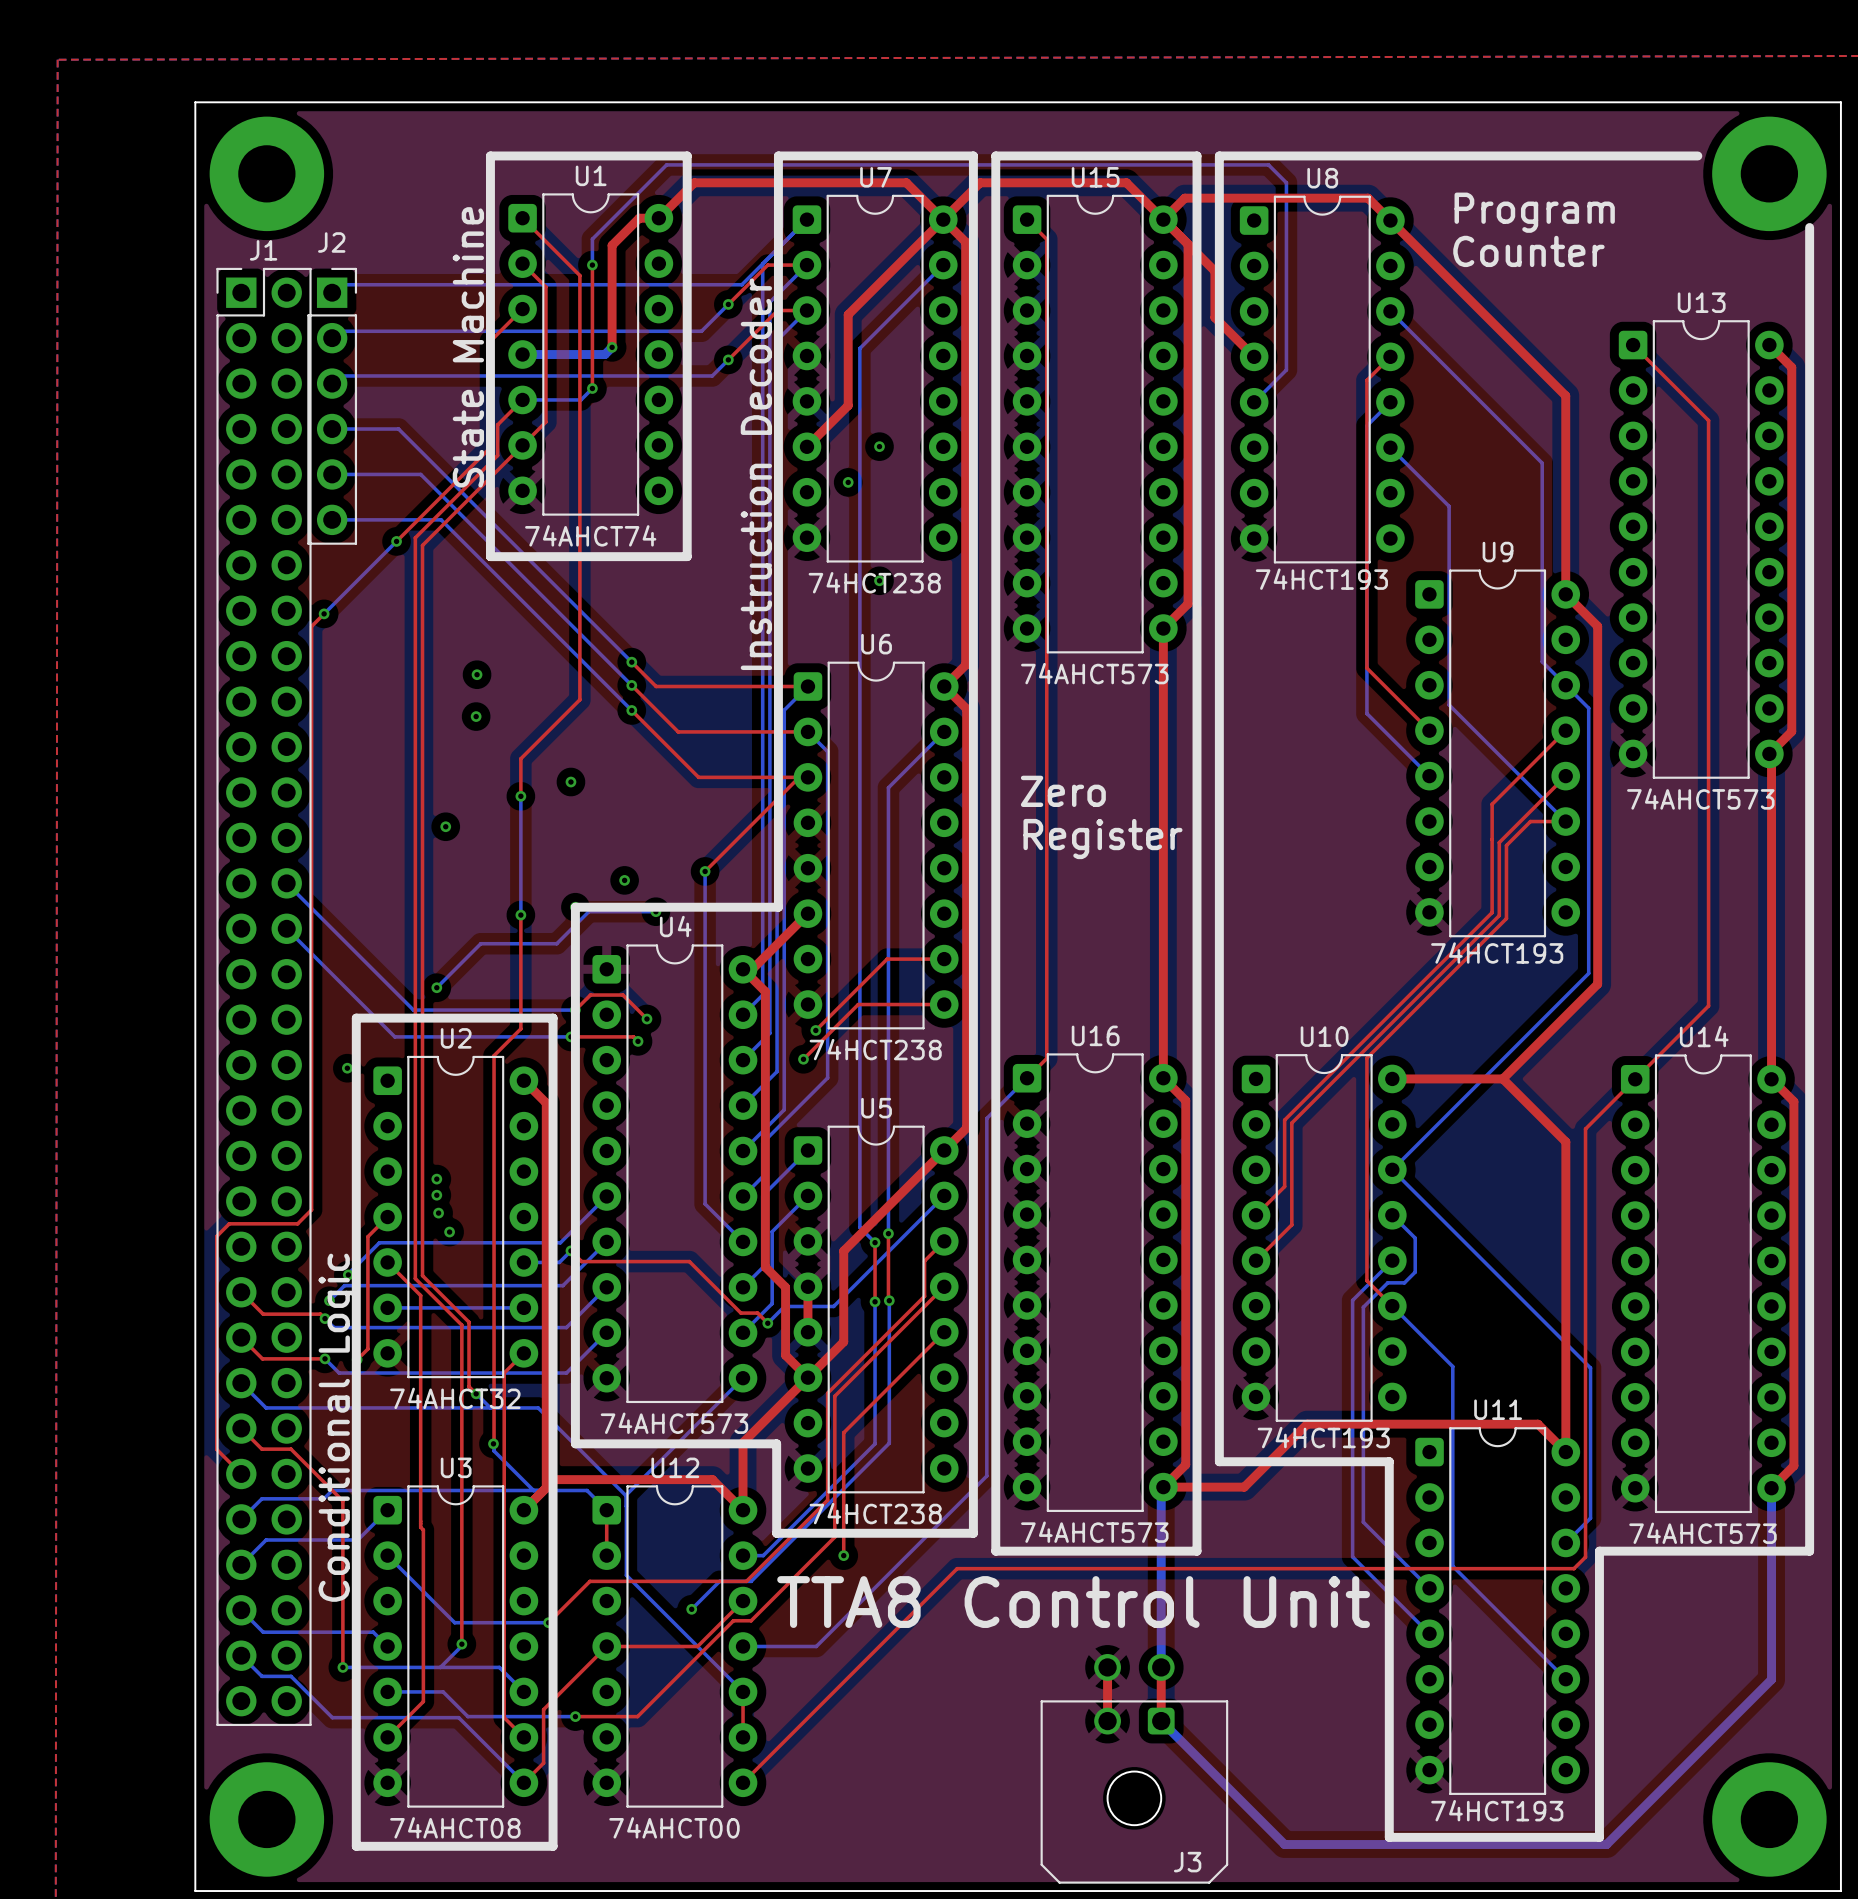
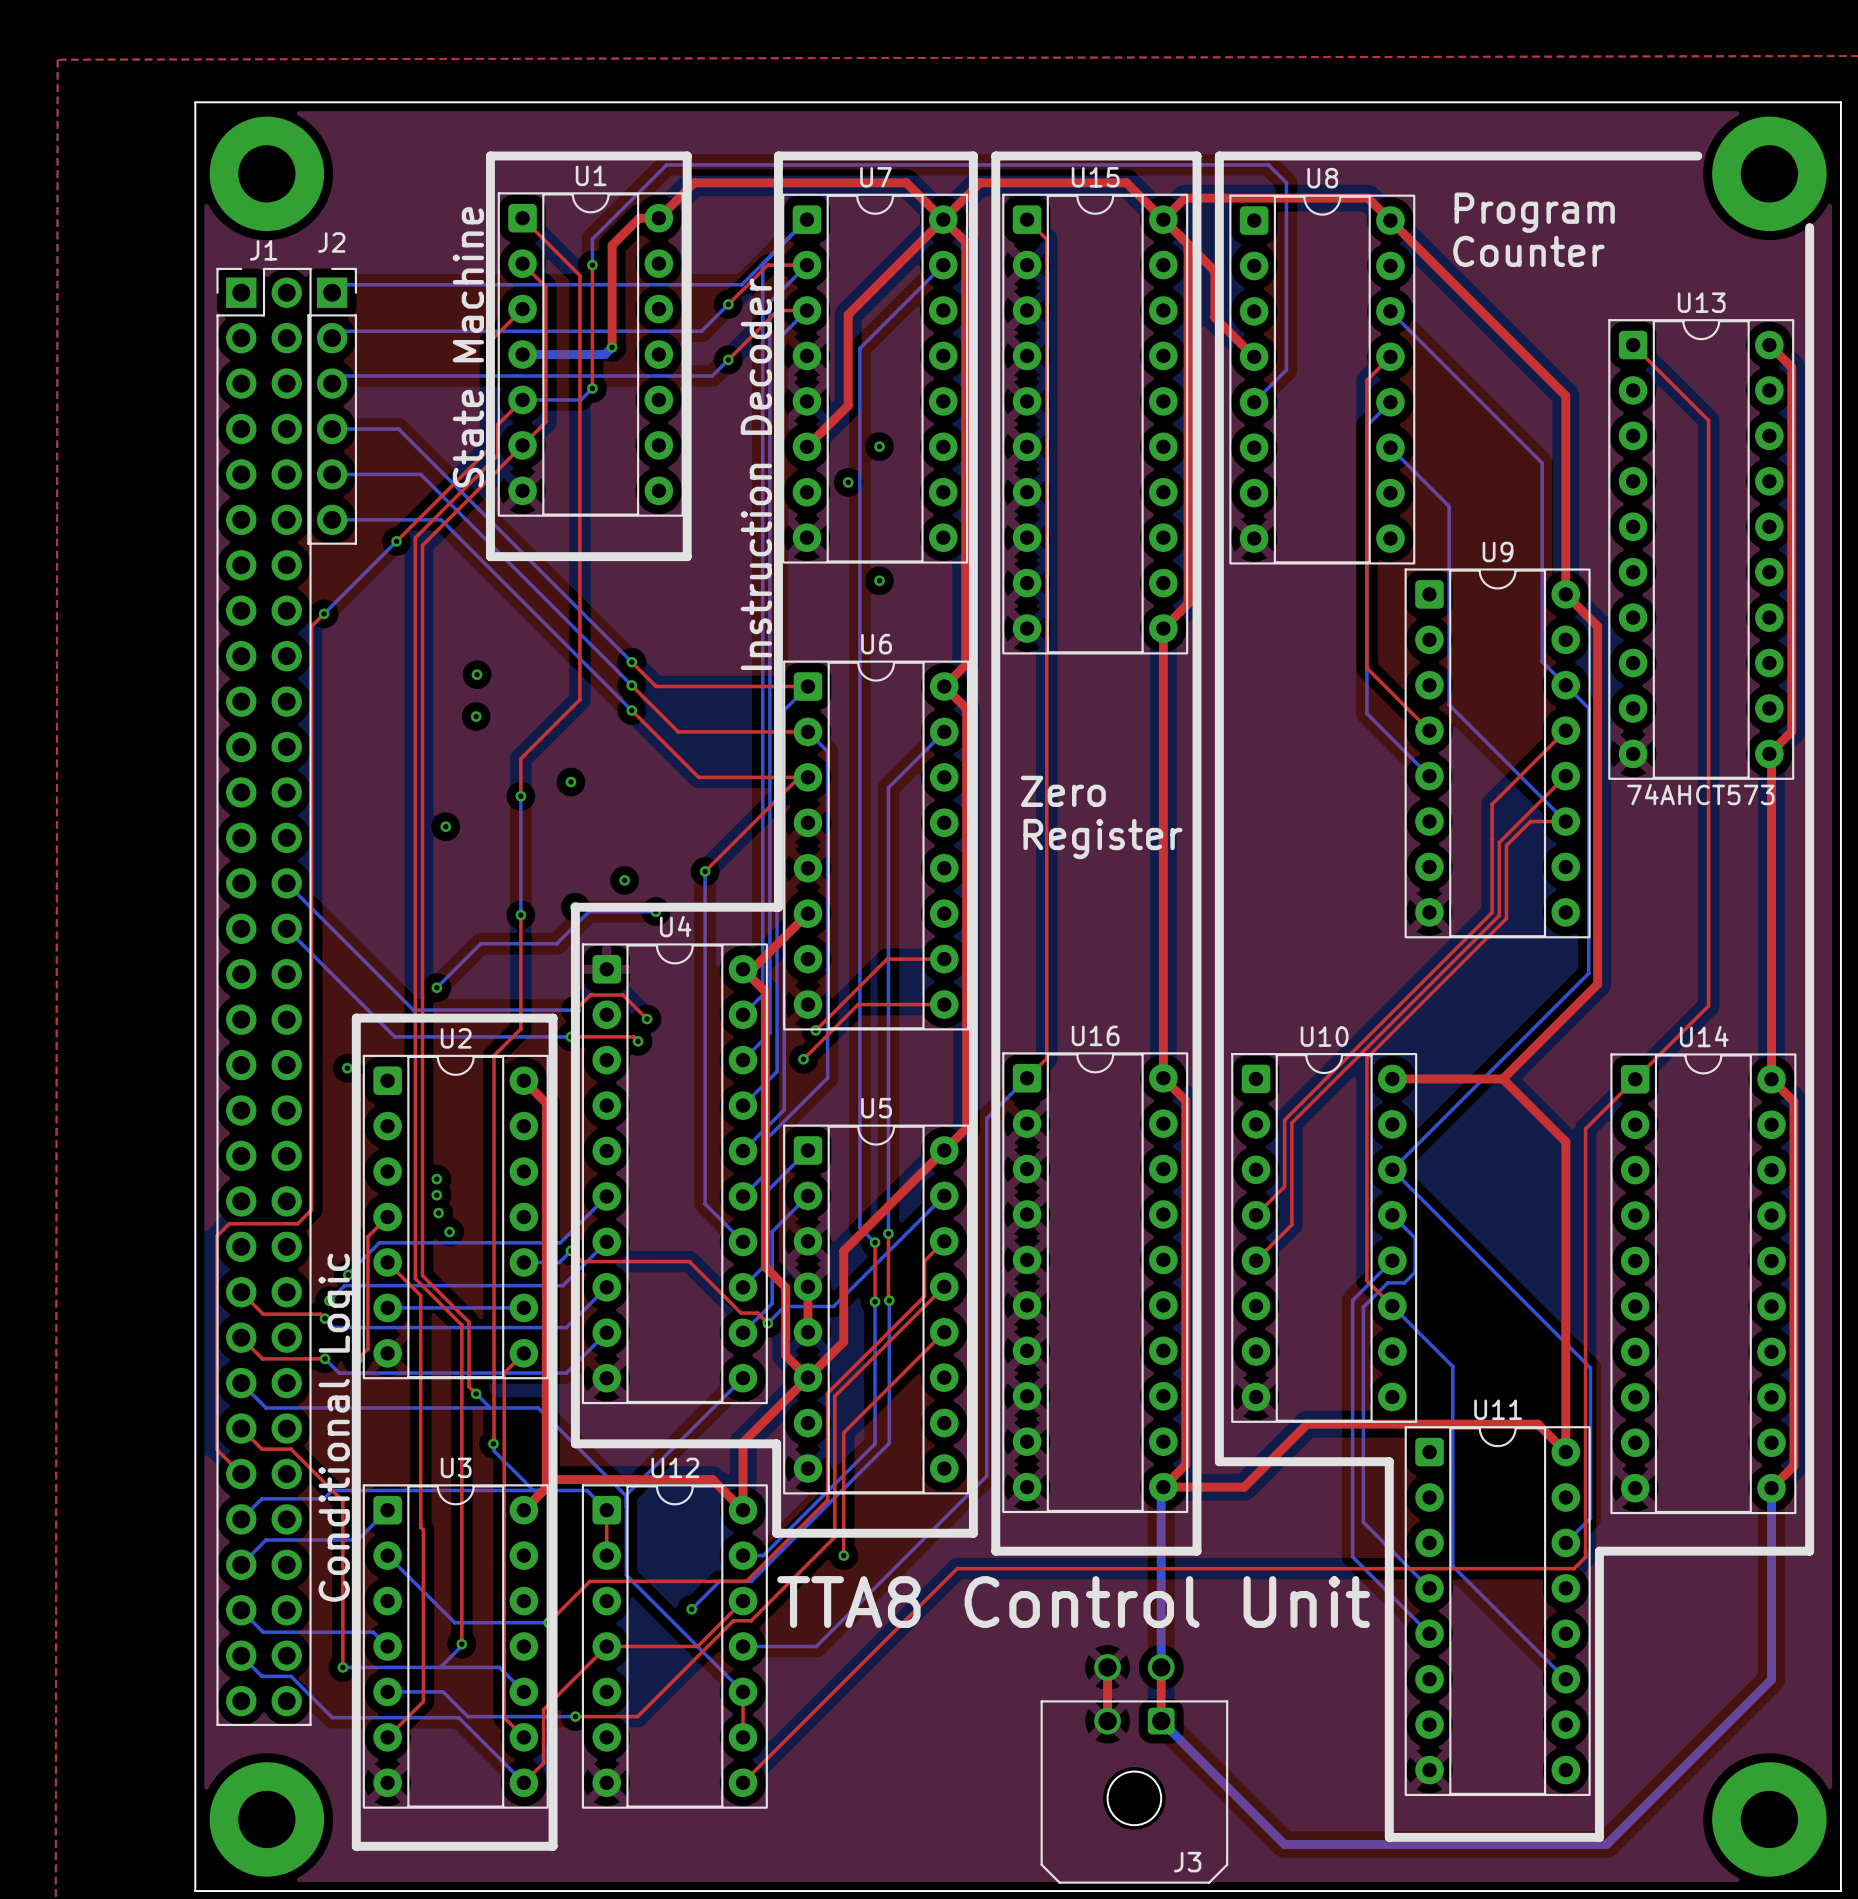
U1 footprint: [508, 193, 674, 516] -> [497, 192, 684, 517]
U7 footprint: [792, 194, 958, 563] -> [782, 193, 969, 564]
U15 footprint: [1012, 194, 1178, 654] -> [1002, 193, 1189, 655]
U8 footprint: [1239, 195, 1405, 564] -> [1229, 194, 1416, 565]
U13 footprint: [1618, 320, 1784, 779] -> [1608, 319, 1795, 780]
U1 value: 74AHCT74 (590, 535) -> none
U9 footprint: [1415, 569, 1581, 938] -> [1404, 568, 1591, 939]
U8 value: 74HCT193 (1321, 579) -> none
U7 value: 74HCT238 (874, 582) -> none
U6 footprint: [793, 661, 959, 1030] -> [783, 660, 970, 1031]
U15 value: 74AHCT573 (1094, 673) -> none
U4 footprint: [592, 944, 758, 1404] -> [581, 943, 768, 1405]
U9 value: 74HCT193 (1497, 952) -> none
U6 value: 74HCT238 (875, 1049) -> none
U16 footprint: [1012, 1053, 1178, 1512] -> [1002, 1052, 1189, 1514]
U10 footprint: [1241, 1054, 1407, 1422] -> [1231, 1053, 1418, 1423]
U14 footprint: [1620, 1054, 1786, 1514] -> [1610, 1053, 1797, 1515]
U2 footprint: [373, 1055, 539, 1379] -> [362, 1054, 549, 1380]
U5 footprint: [793, 1125, 959, 1494] -> [783, 1124, 970, 1495]
U2 value: 74AHCT32 (455, 1398) -> none
U4 value: 74AHCT573 (674, 1423) -> none
U11 footprint: [1415, 1427, 1581, 1795] -> [1404, 1426, 1591, 1797]
U10 value: 74HCT193 (1323, 1437) -> none
U3 footprint: [373, 1485, 539, 1808] -> [362, 1484, 549, 1809]
U12 footprint: [592, 1485, 758, 1808] -> [581, 1484, 768, 1809]
U5 value: 74HCT238 (875, 1513) -> none
U16 value: 74AHCT573 (1094, 1532) -> none
U14 value: 74AHCT573 (1702, 1533) -> none
U11 value: 74HCT193 (1497, 1810) -> none
U3 value: 74AHCT08 (455, 1827) -> none
U12 value: 74AHCT00 (674, 1827) -> none

